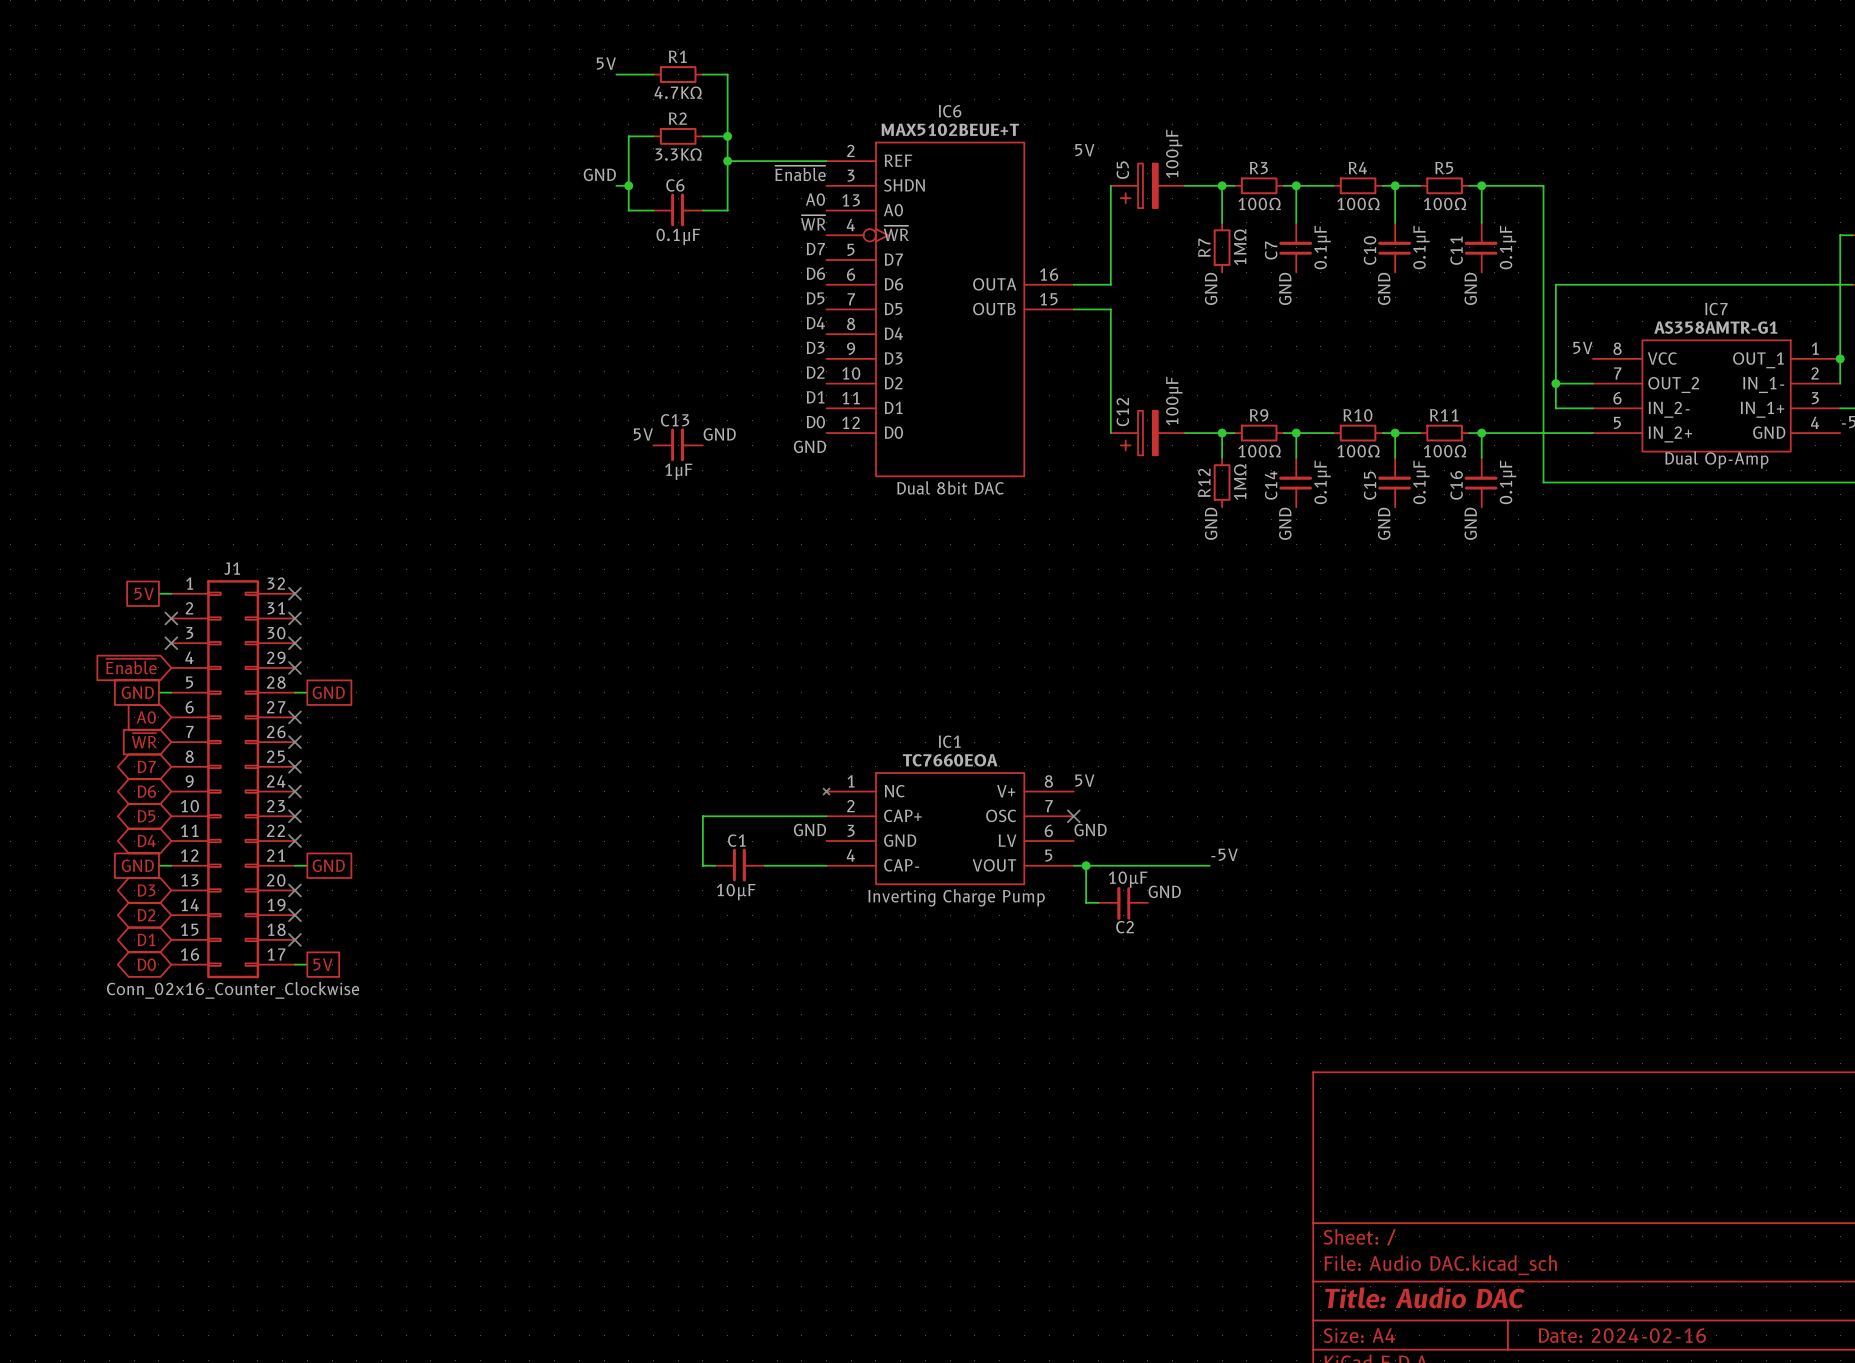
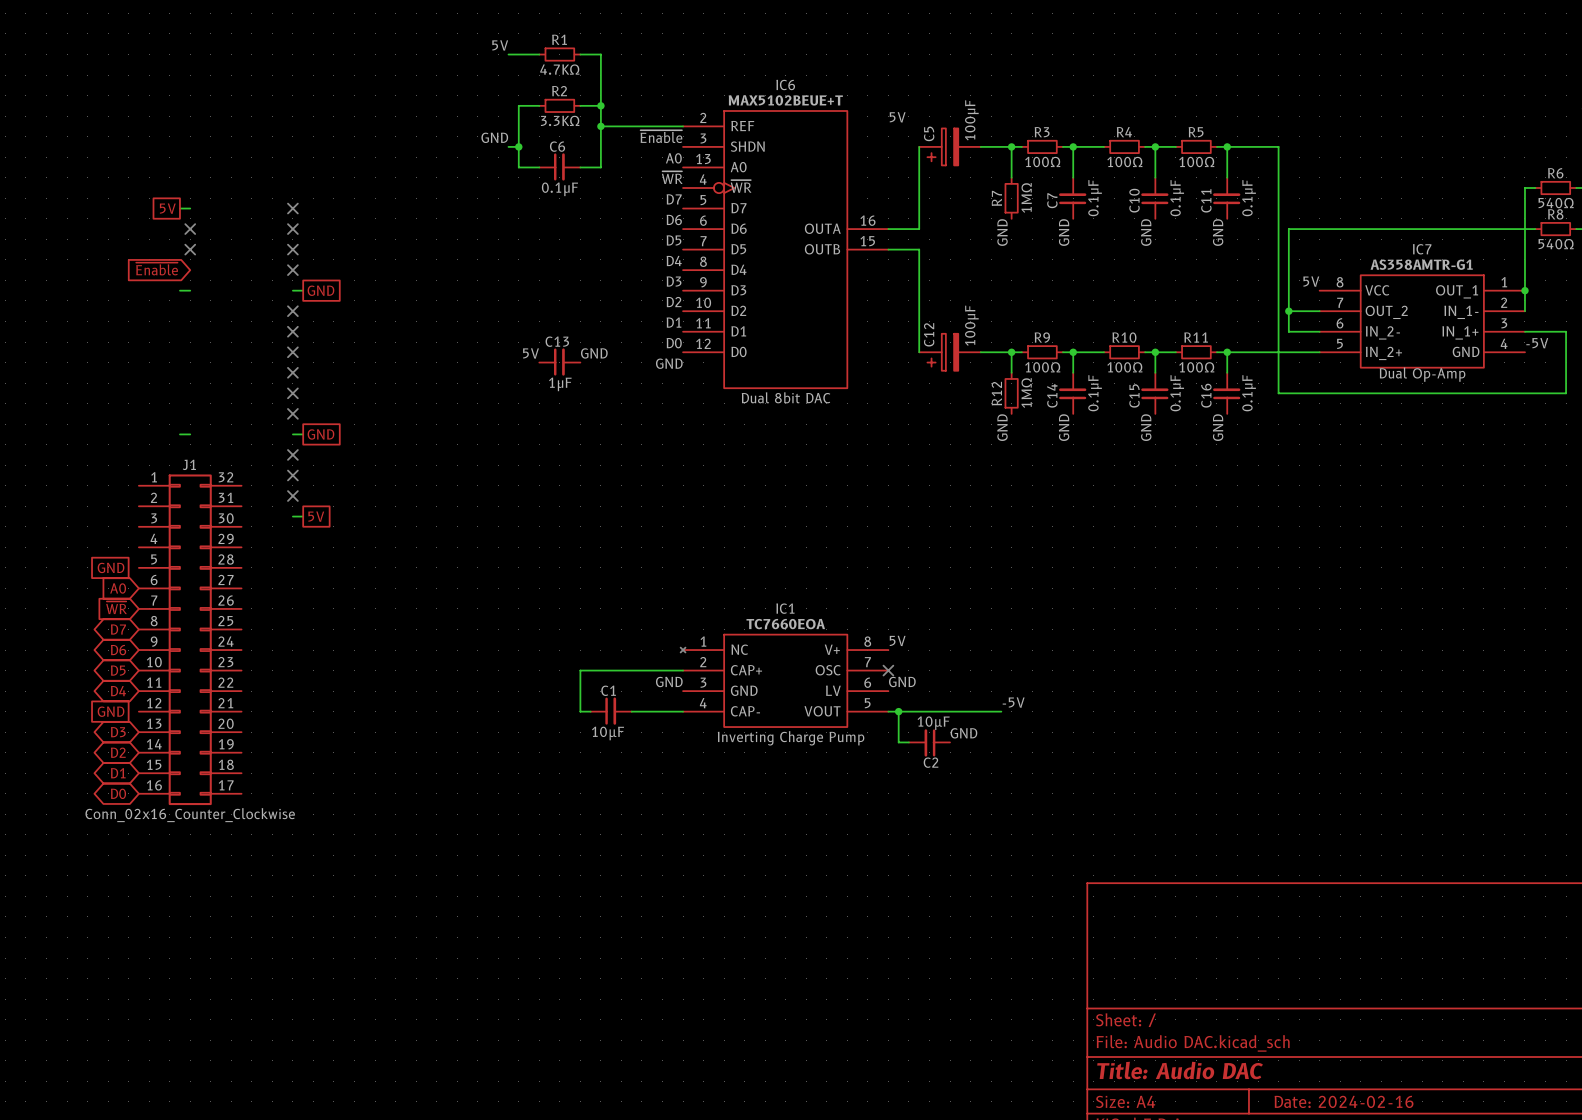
wire: none -> (179, 208) (190, 208)
no-connect mark: none -> (292, 208)
global label: none -> 5V (167, 208)
no-connect mark: none -> (190, 229)
no-connect mark: none -> (292, 229)
no-connect mark: none -> (190, 249)
no-connect mark: none -> (292, 249)
global label: none -> ~{Enable} (157, 269)
no-connect mark: none -> (292, 270)
wire: none -> (179, 290) (190, 290)
wire: none -> (292, 290) (303, 290)
global label: none -> GND (320, 290)
no-connect mark: none -> (292, 311)
no-connect mark: none -> (292, 331)
no-connect mark: none -> (292, 352)
no-connect mark: none -> (292, 372)
no-connect mark: none -> (292, 393)
no-connect mark: none -> (292, 413)
wire: none -> (292, 434) (303, 434)
global label: none -> GND (320, 434)
no-connect mark: none -> (292, 454)
no-connect mark: none -> (292, 475)
global label: 5V (144, 593) -> none
wire: (158, 593) (171, 593) -> (179, 434) (190, 434)
no-connect mark: (294, 593) -> none
no-connect mark: none -> (292, 496)
no-connect mark: (171, 618) -> none
no-connect mark: (294, 618) -> none
global label: none -> 5V (316, 516)
no-connect mark: (171, 643) -> none
no-connect mark: (294, 643) -> none
global label: ~{Enable} (131, 666) -> none
no-connect mark: (294, 667) -> none
wire: (158, 692) (171, 692) -> none
wire: (294, 692) (307, 692) -> (292, 516) (303, 516)
global label: GND (328, 692) -> none
no-connect mark: (294, 717) -> none
no-connect mark: (294, 742) -> none
no-connect mark: (294, 766) -> none
no-connect mark: (294, 791) -> none
no-connect mark: (294, 816) -> none
no-connect mark: (294, 841) -> none
wire: (158, 865) (171, 865) -> none
wire: (294, 865) (307, 865) -> none
global label: GND (328, 865) -> none
no-connect mark: (294, 890) -> none
no-connect mark: (294, 915) -> none
no-connect mark: (294, 939) -> none
wire: (294, 964) (307, 964) -> none
global label: 5V (323, 964) -> none

